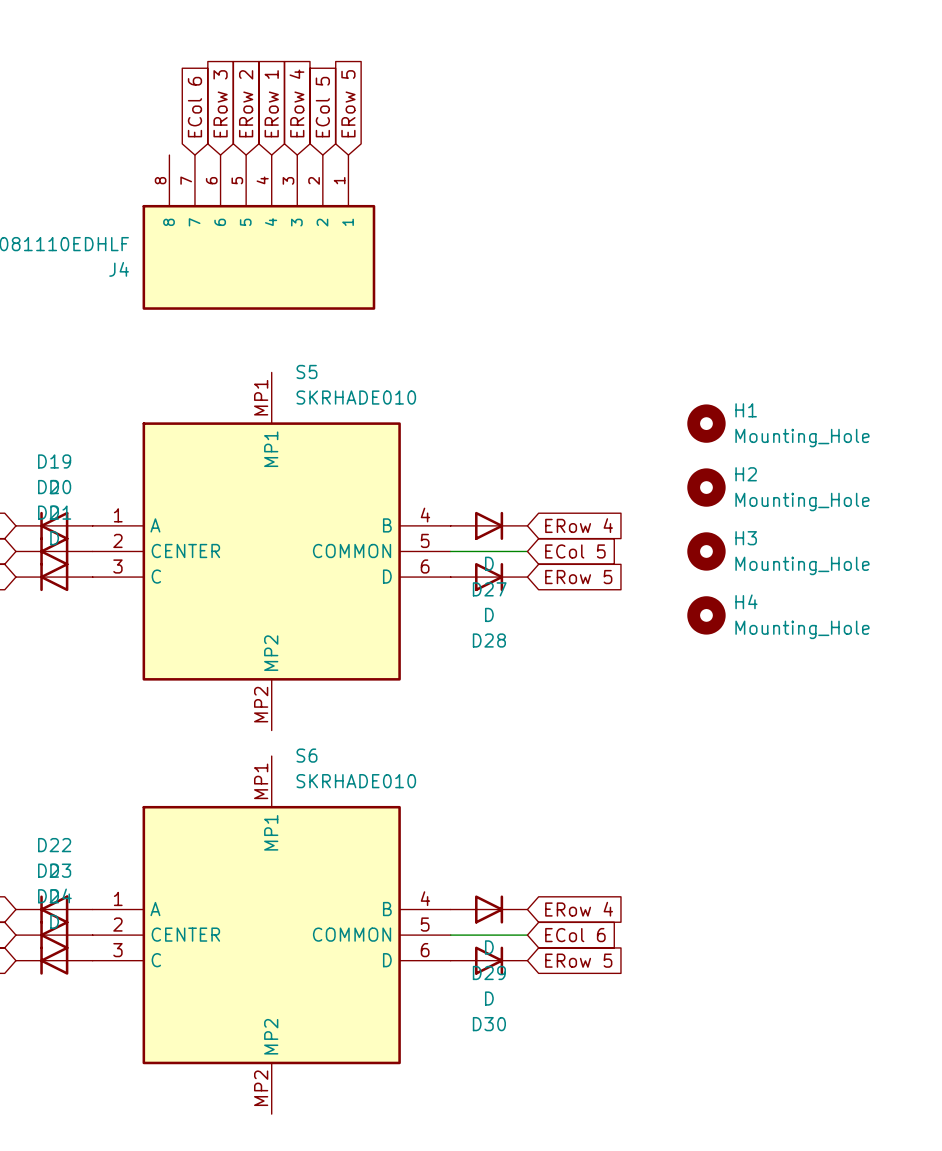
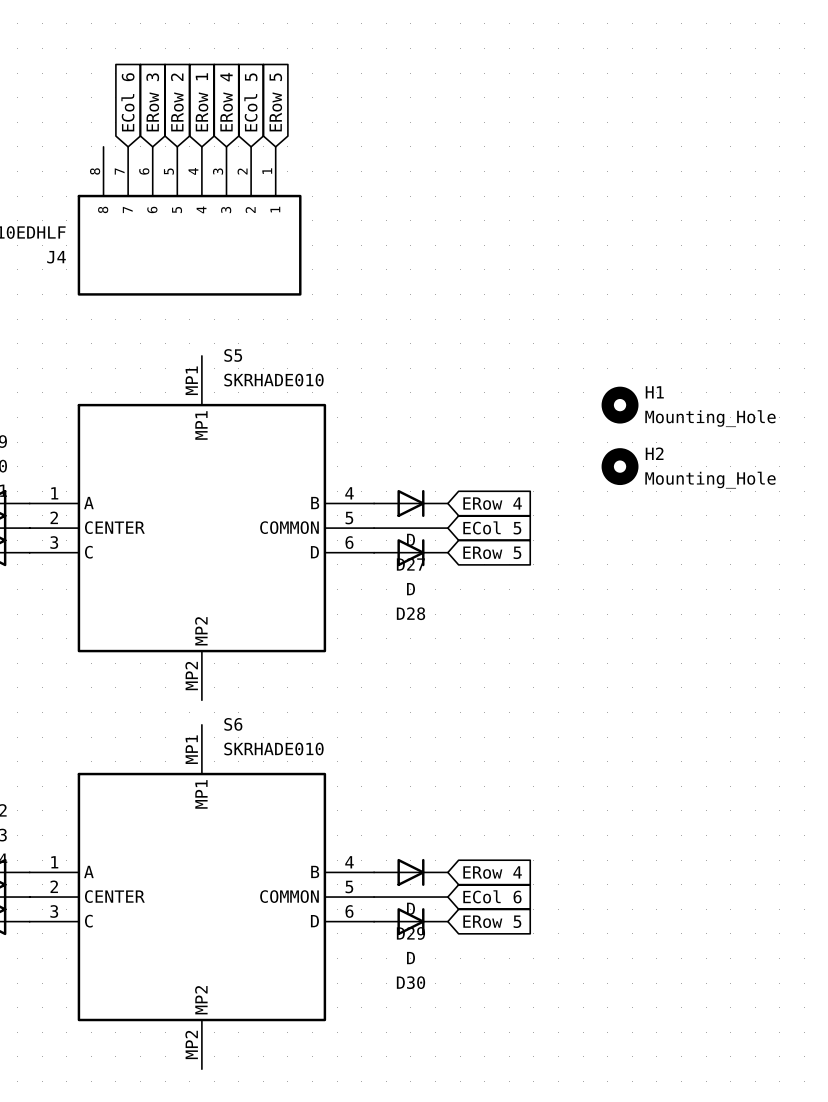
H3: Mounting_Hole (706, 551) -> none
H4: Mounting_Hole (706, 615) -> none

